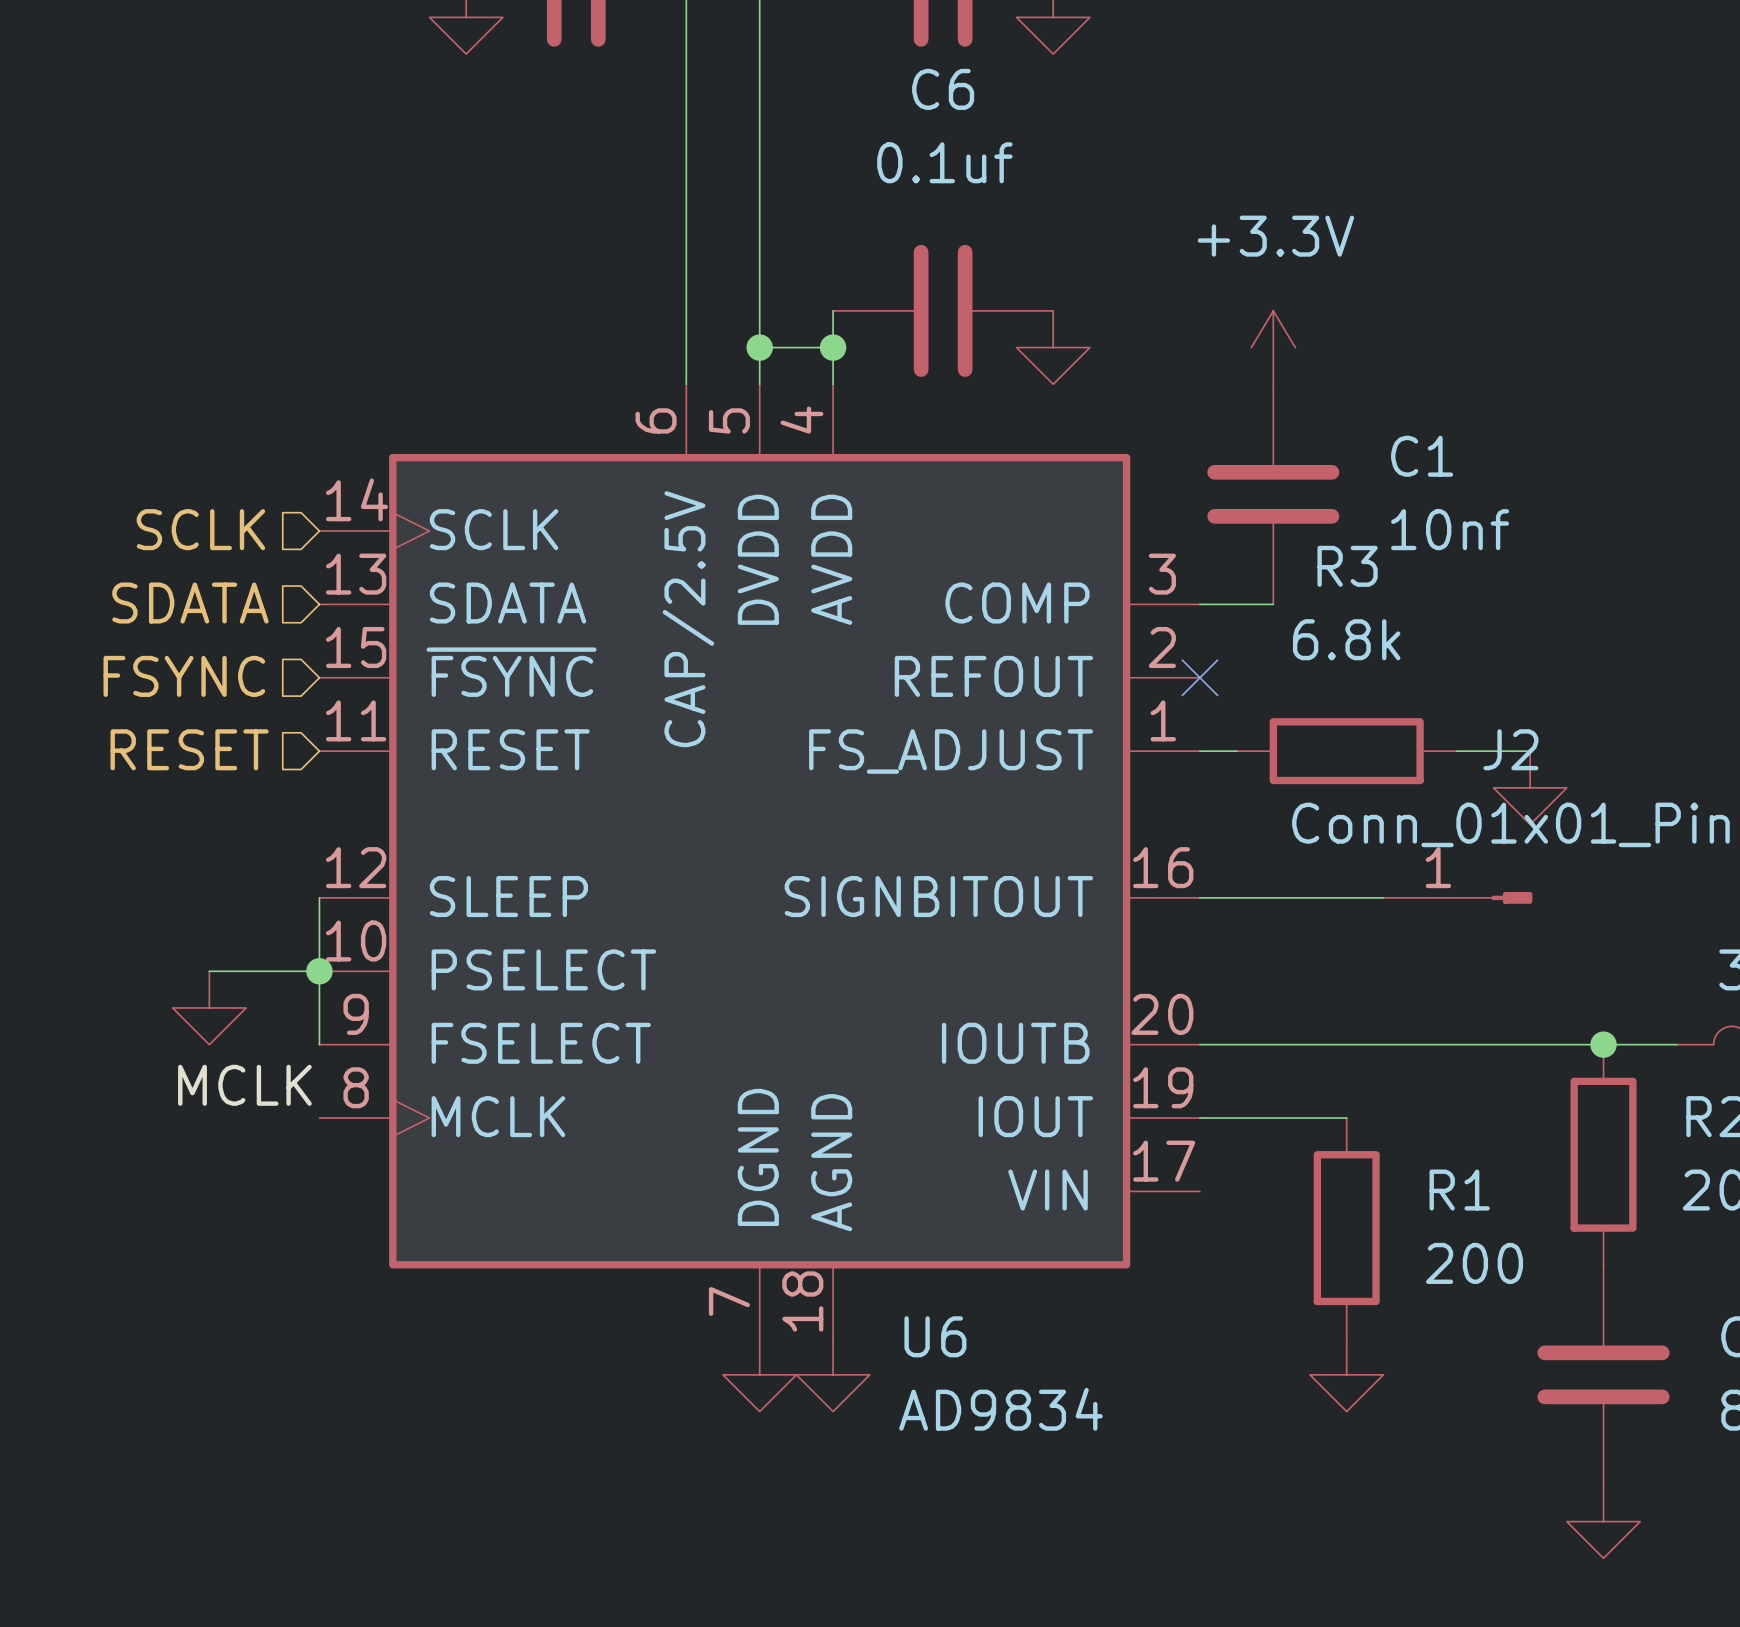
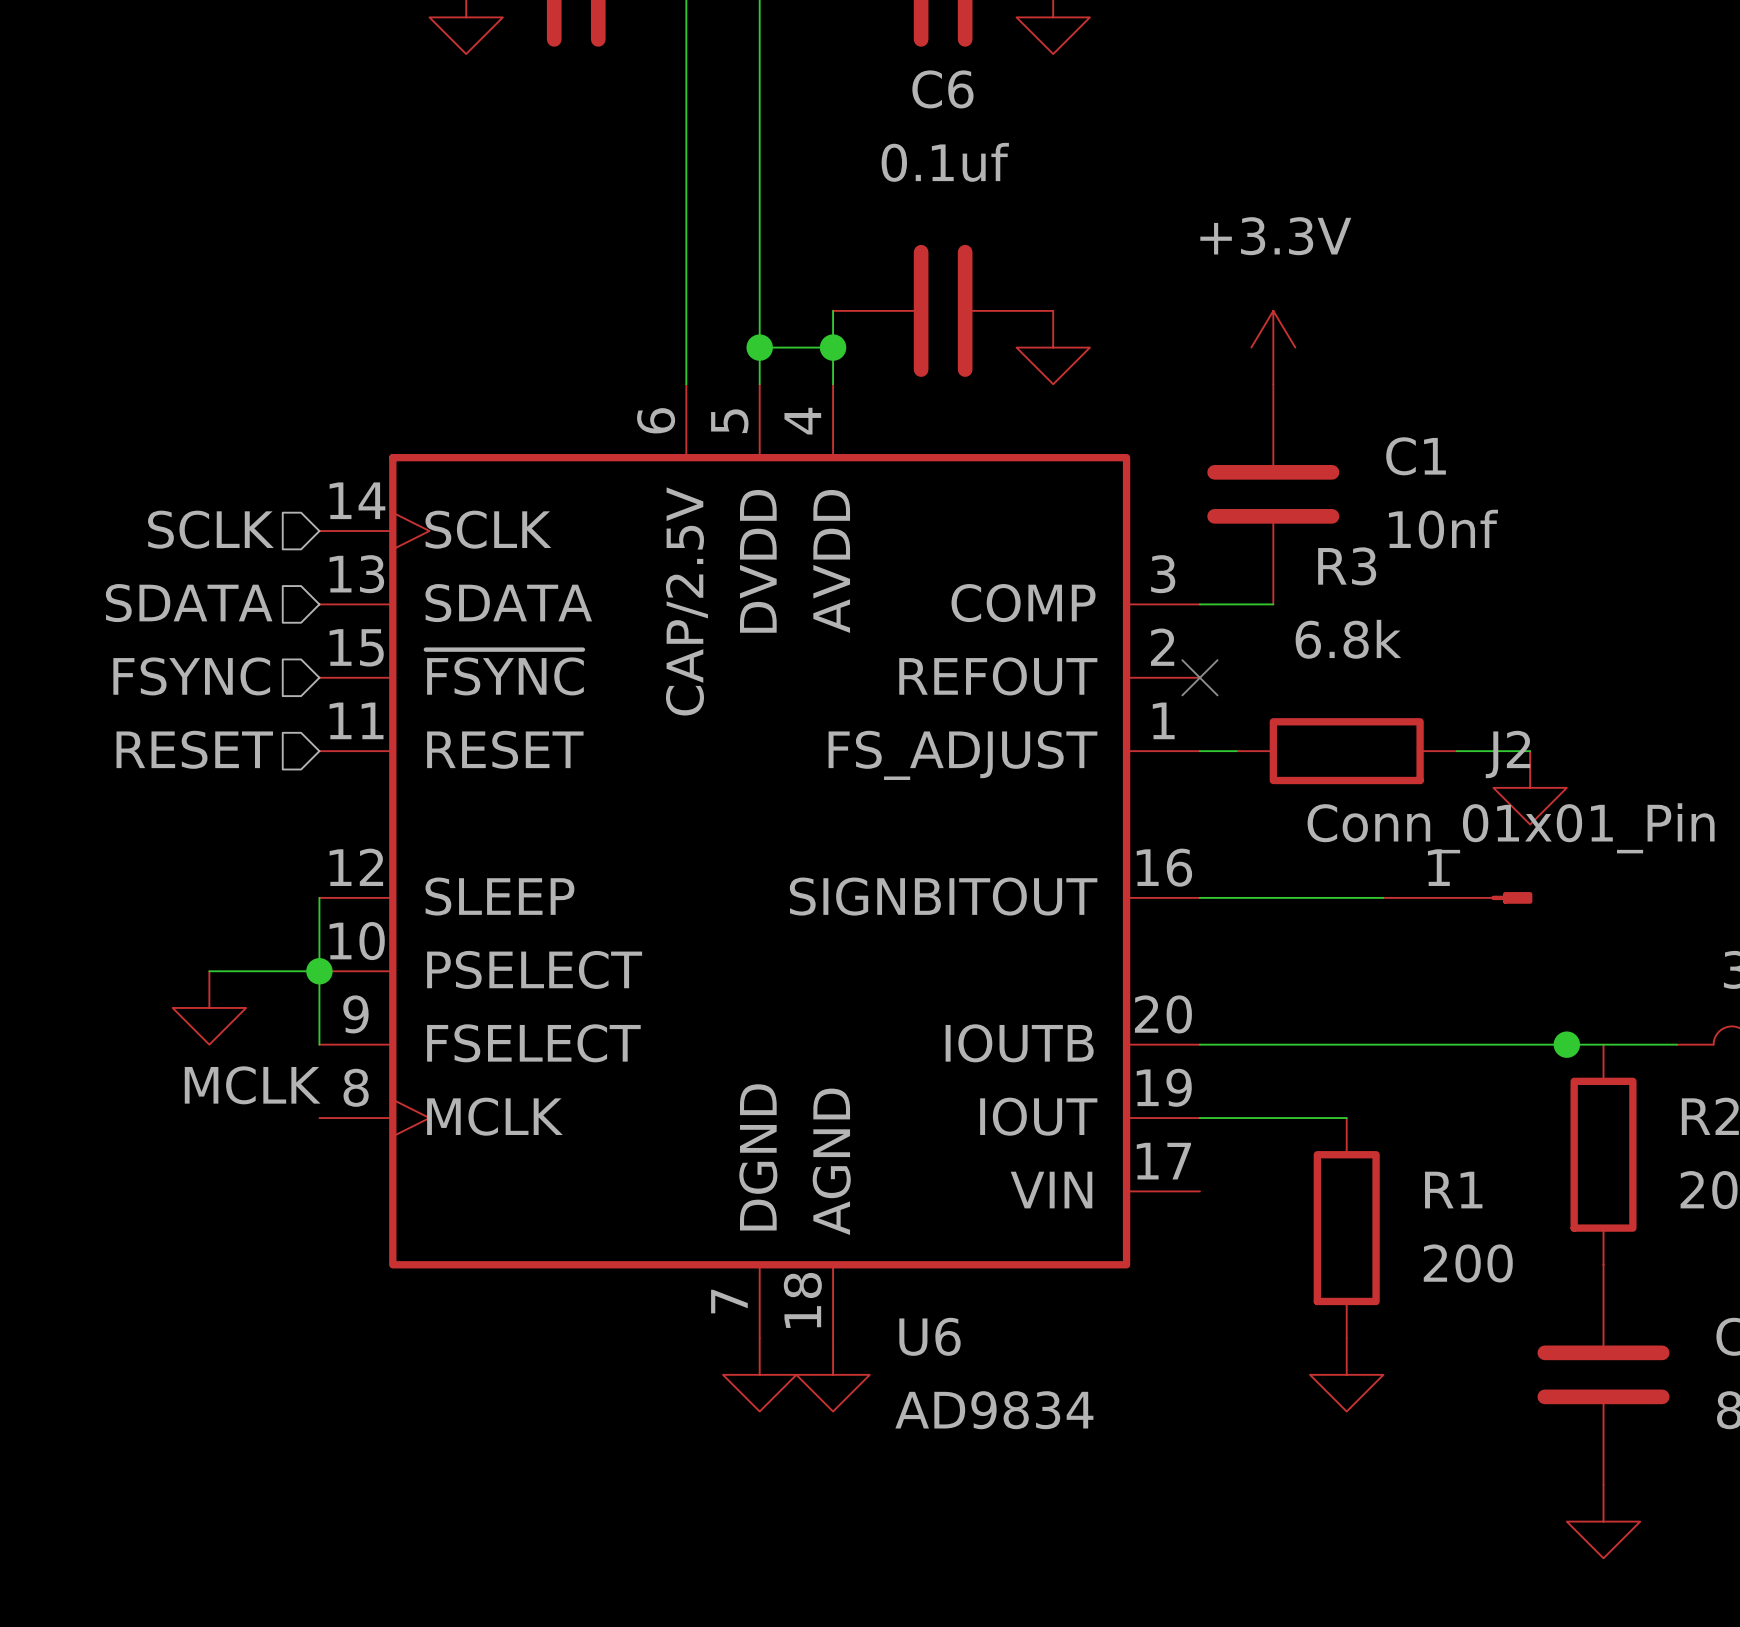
junction position: (1603, 1044) -> (1566, 1044)

